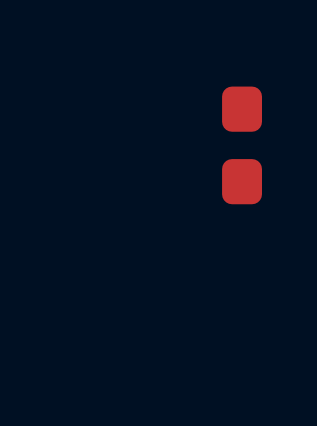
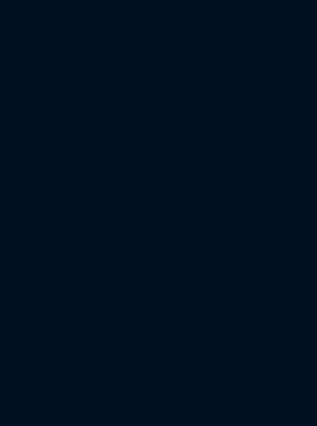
part: (242, 145) -> none

